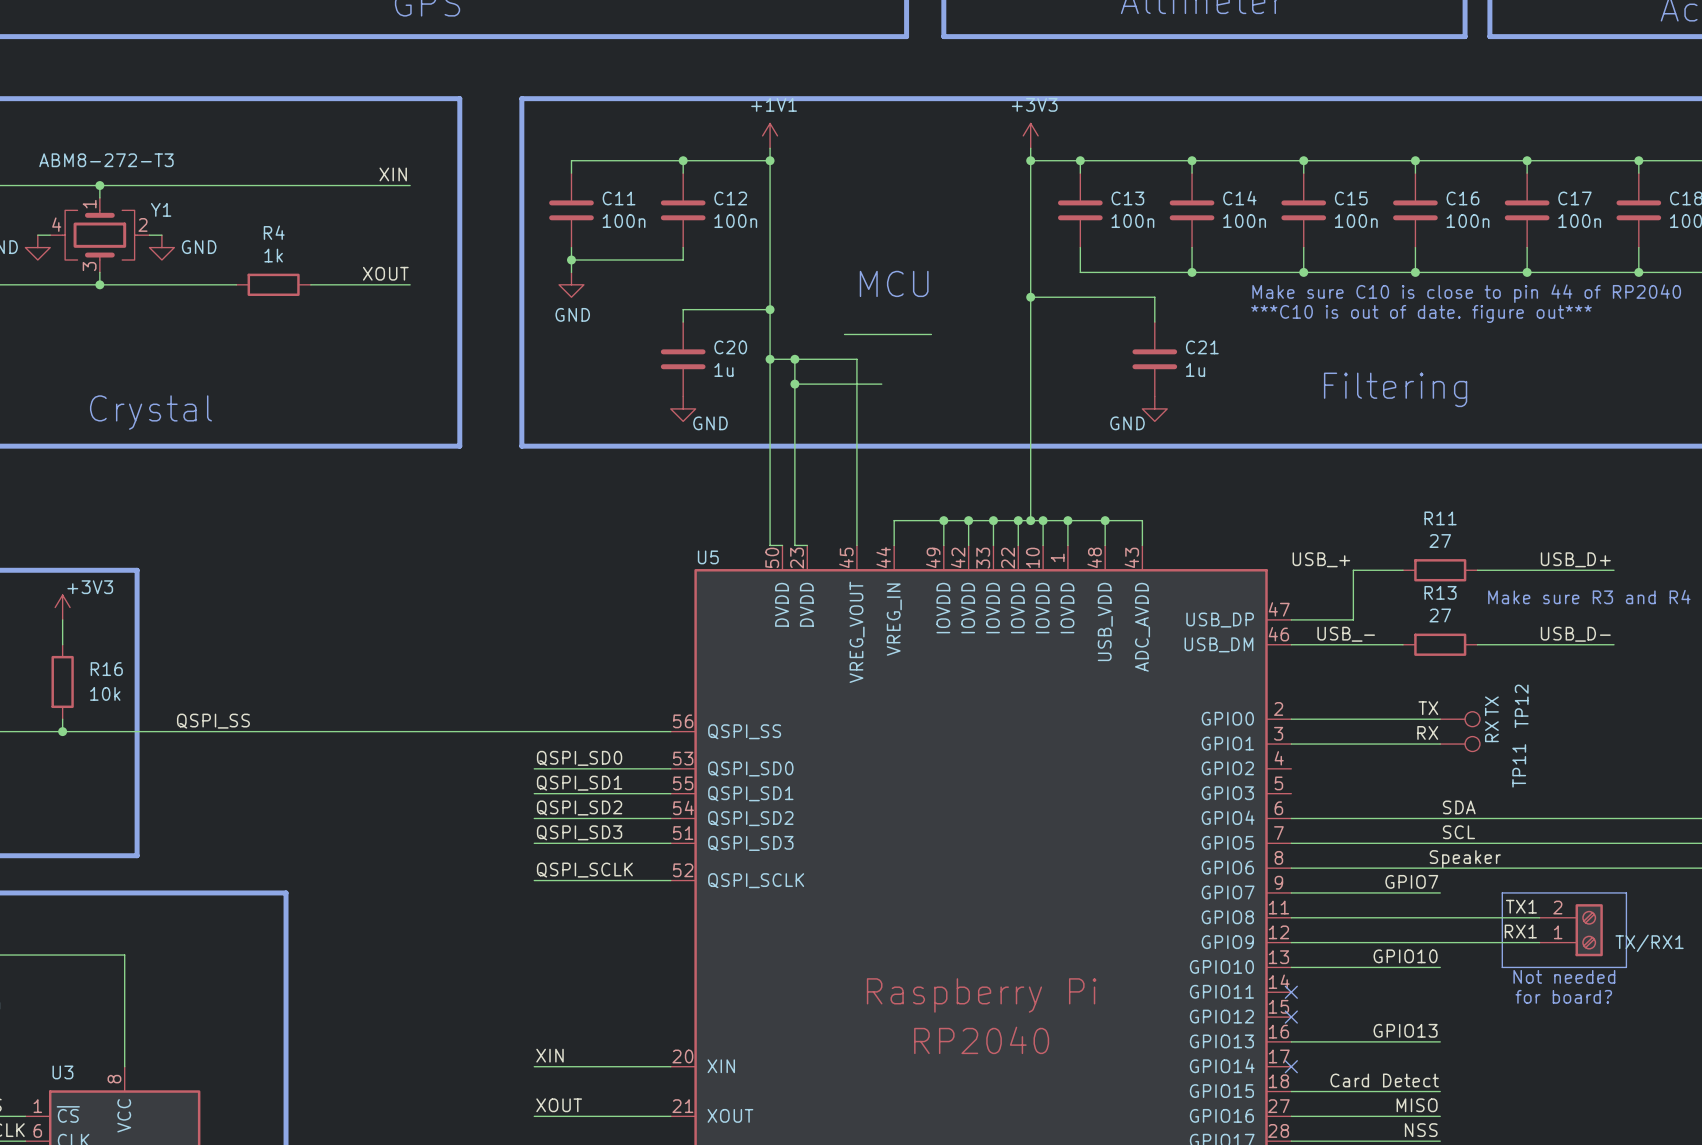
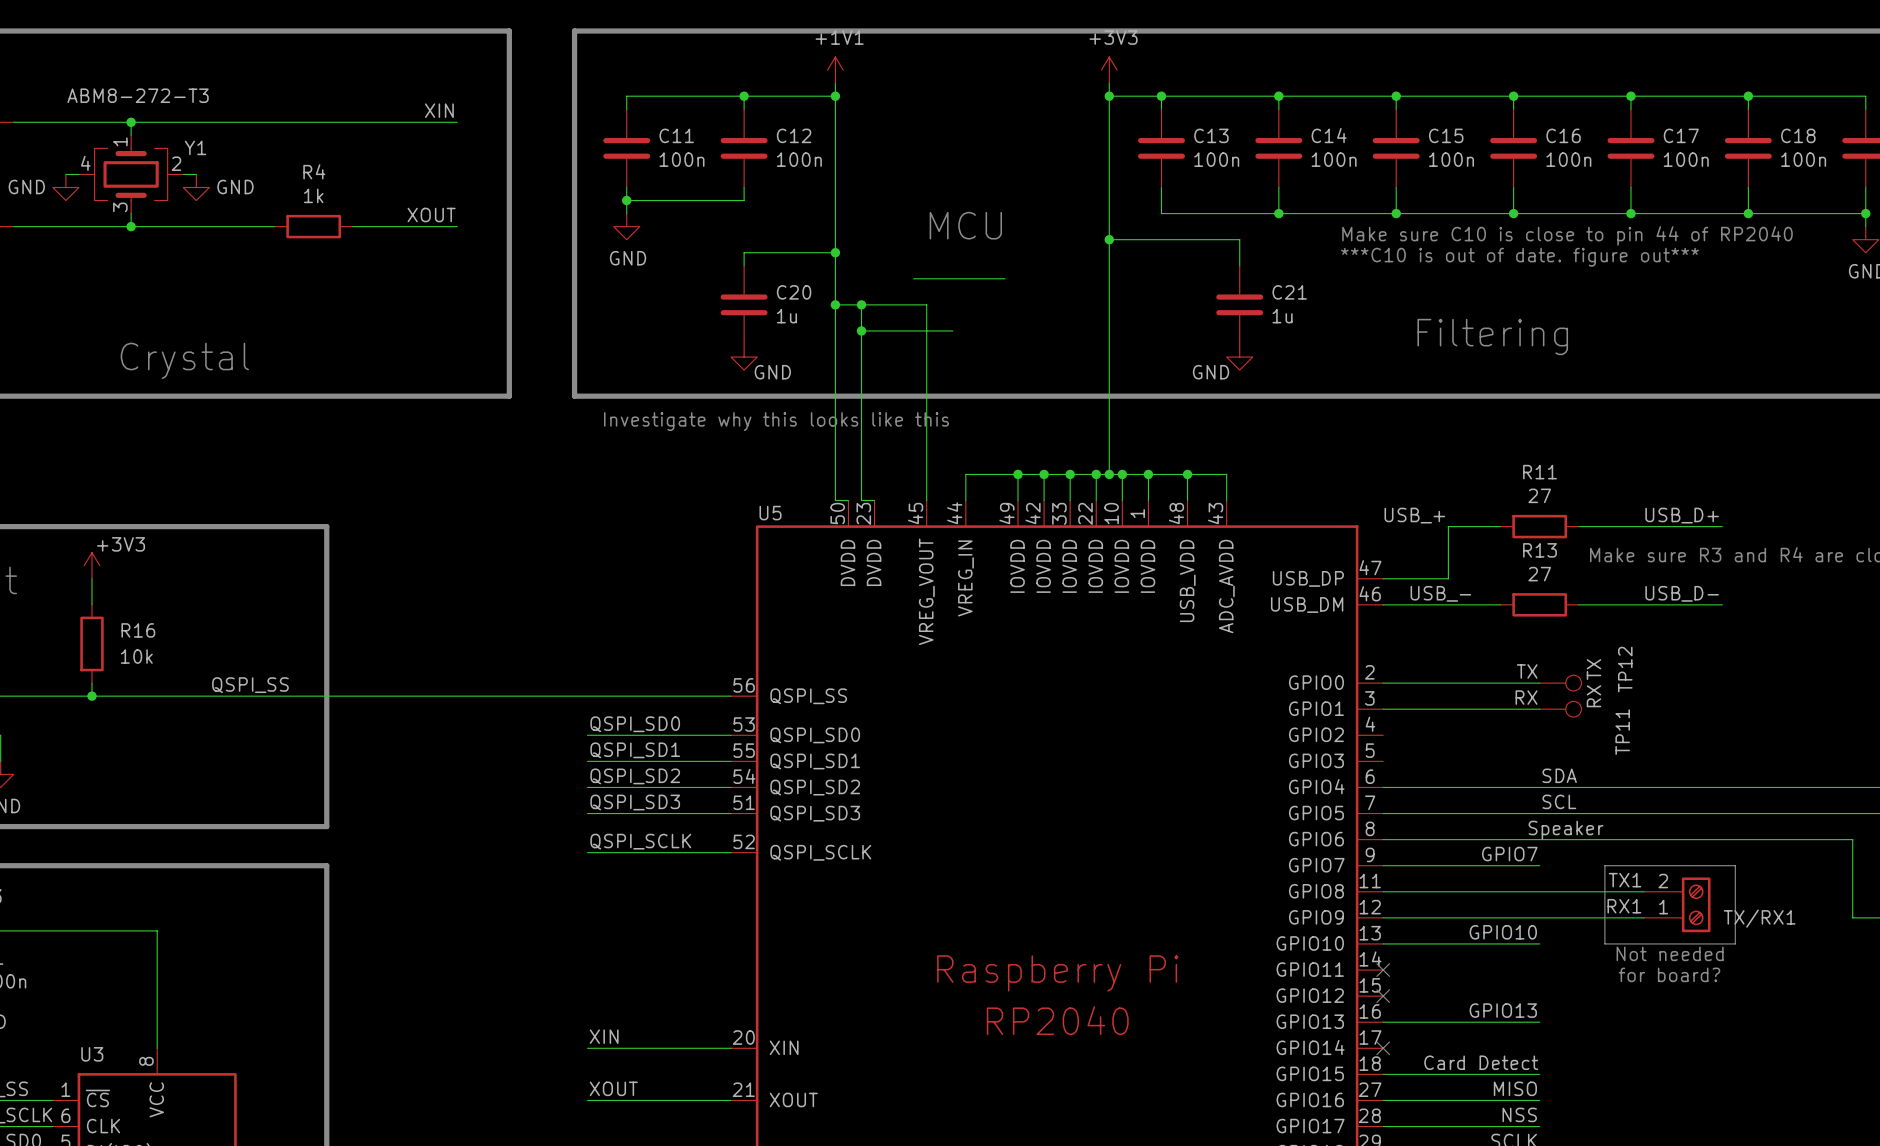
text: none -> Investigate why this looks like this (776, 421)
line: (137, 570) (137, 855) -> (170, 526) (326, 526) (326, 826) (170, 826)

